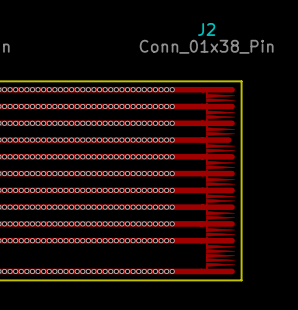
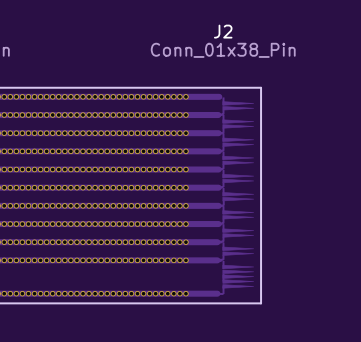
track: (203, 89) (232, 89) -> none
track: (202, 106) (232, 106) -> none
track: (202, 123) (232, 123) -> none
track: (202, 140) (228, 140) -> none
track: (202, 156) (232, 156) -> none
track: (202, 173) (232, 173) -> none
track: (202, 190) (232, 190) -> none
track: (202, 207) (232, 207) -> none
track: (201, 223) (232, 223) -> none
track: (201, 240) (232, 240) -> none
track: (201, 271) (232, 271) -> none

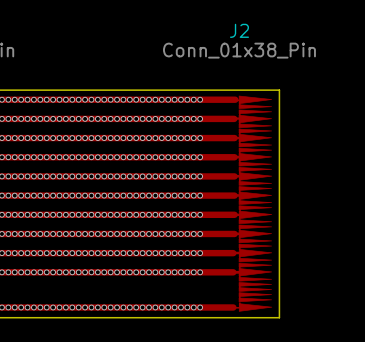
drawing: none -> [238, 95, 273, 277]
drawing: none -> [238, 303, 273, 312]

